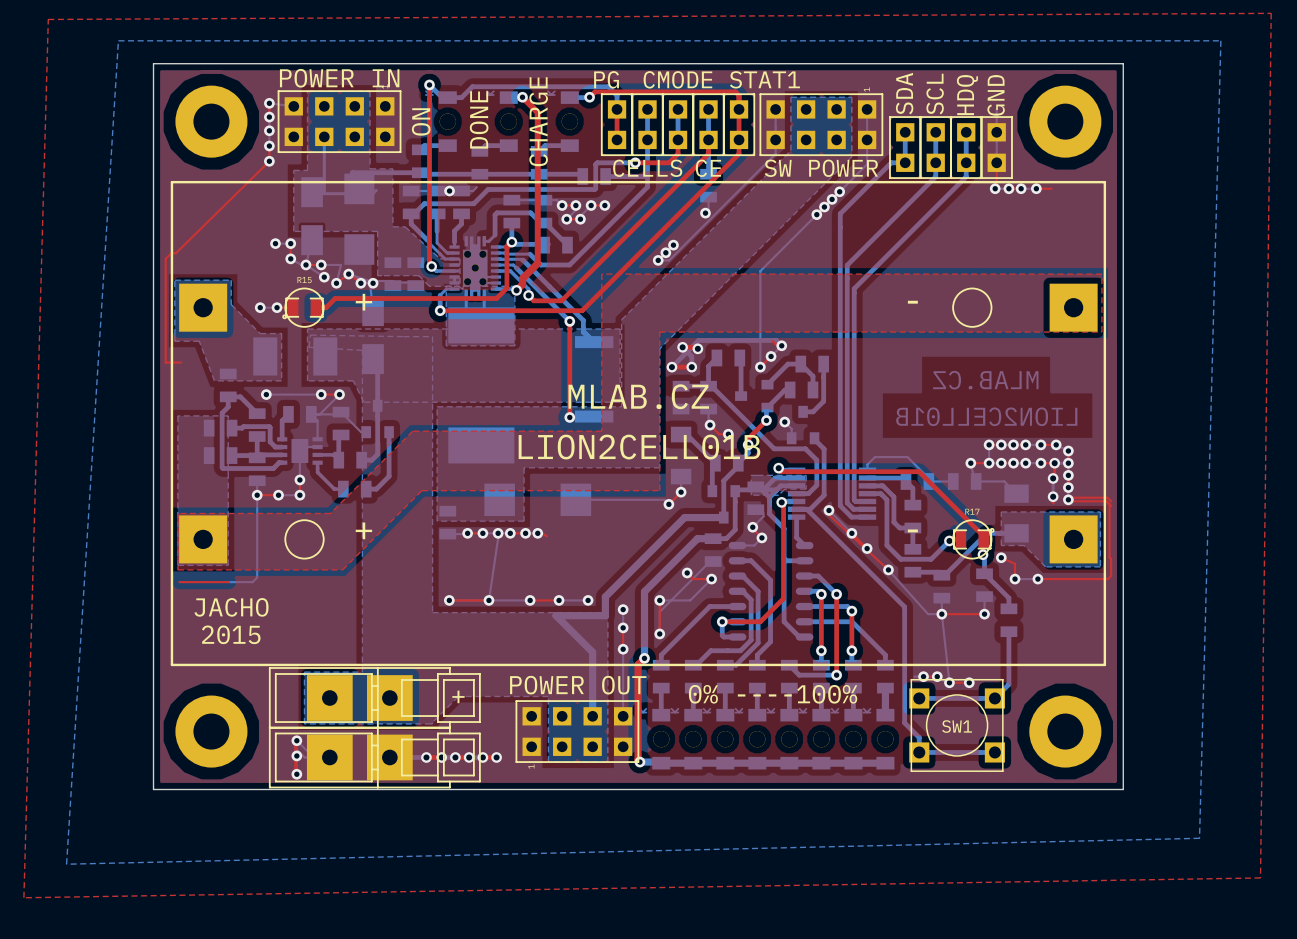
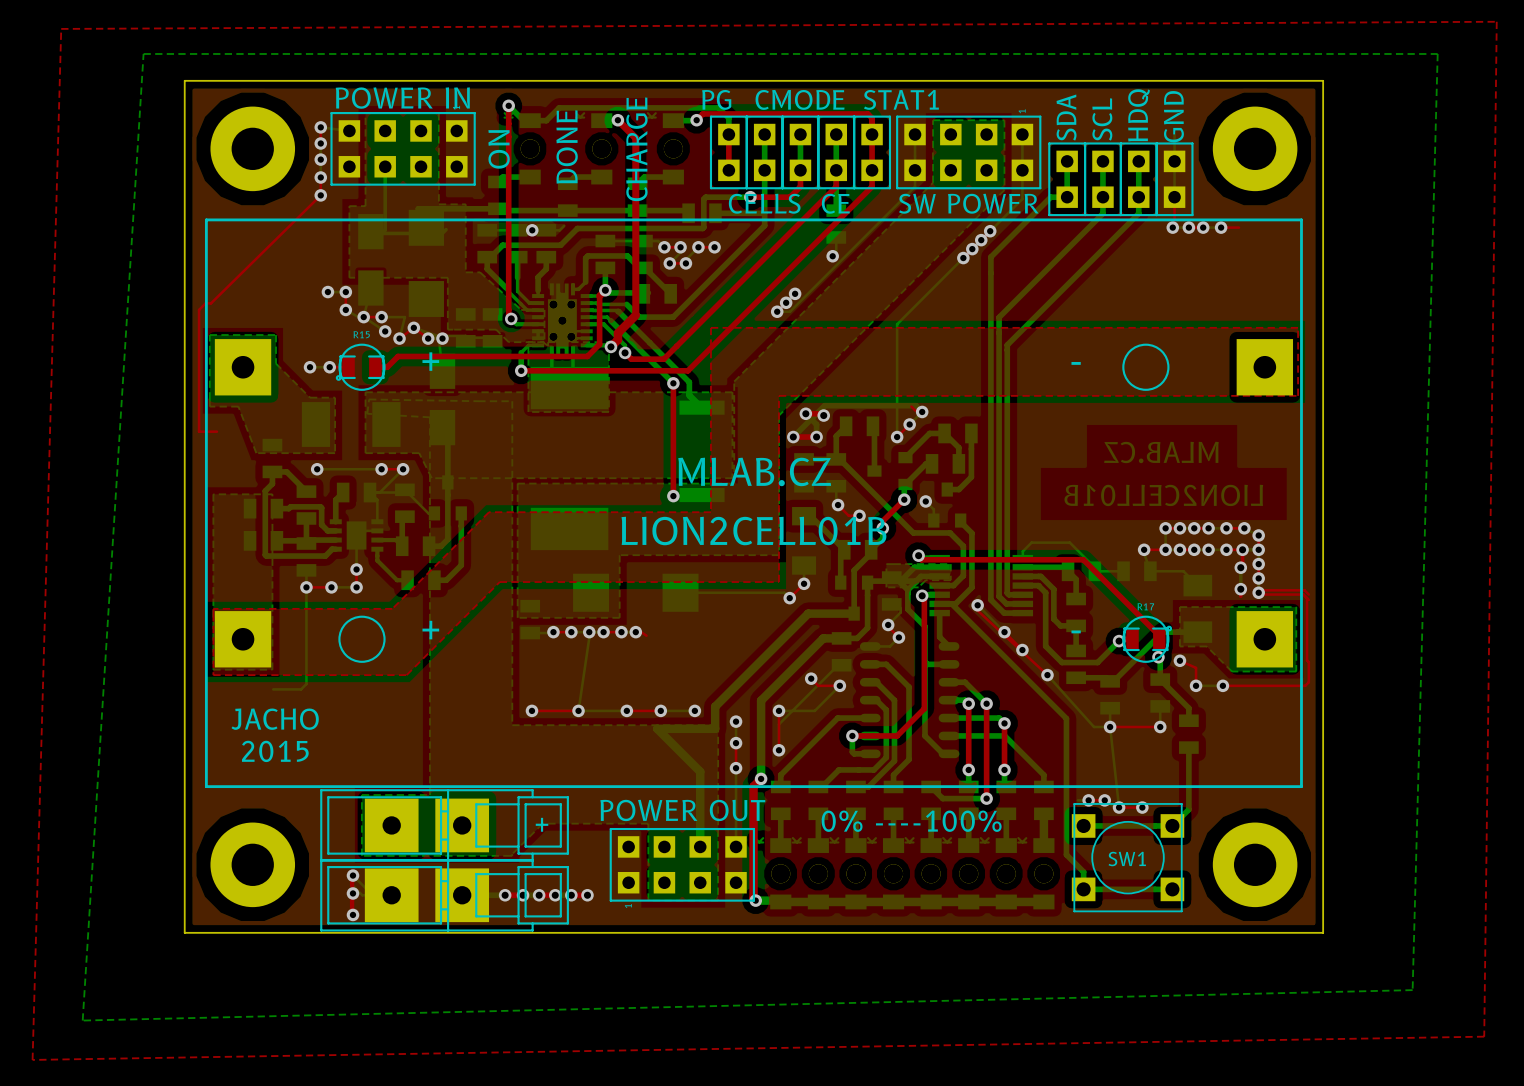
top track: (179, 582) (228, 582) -> none

